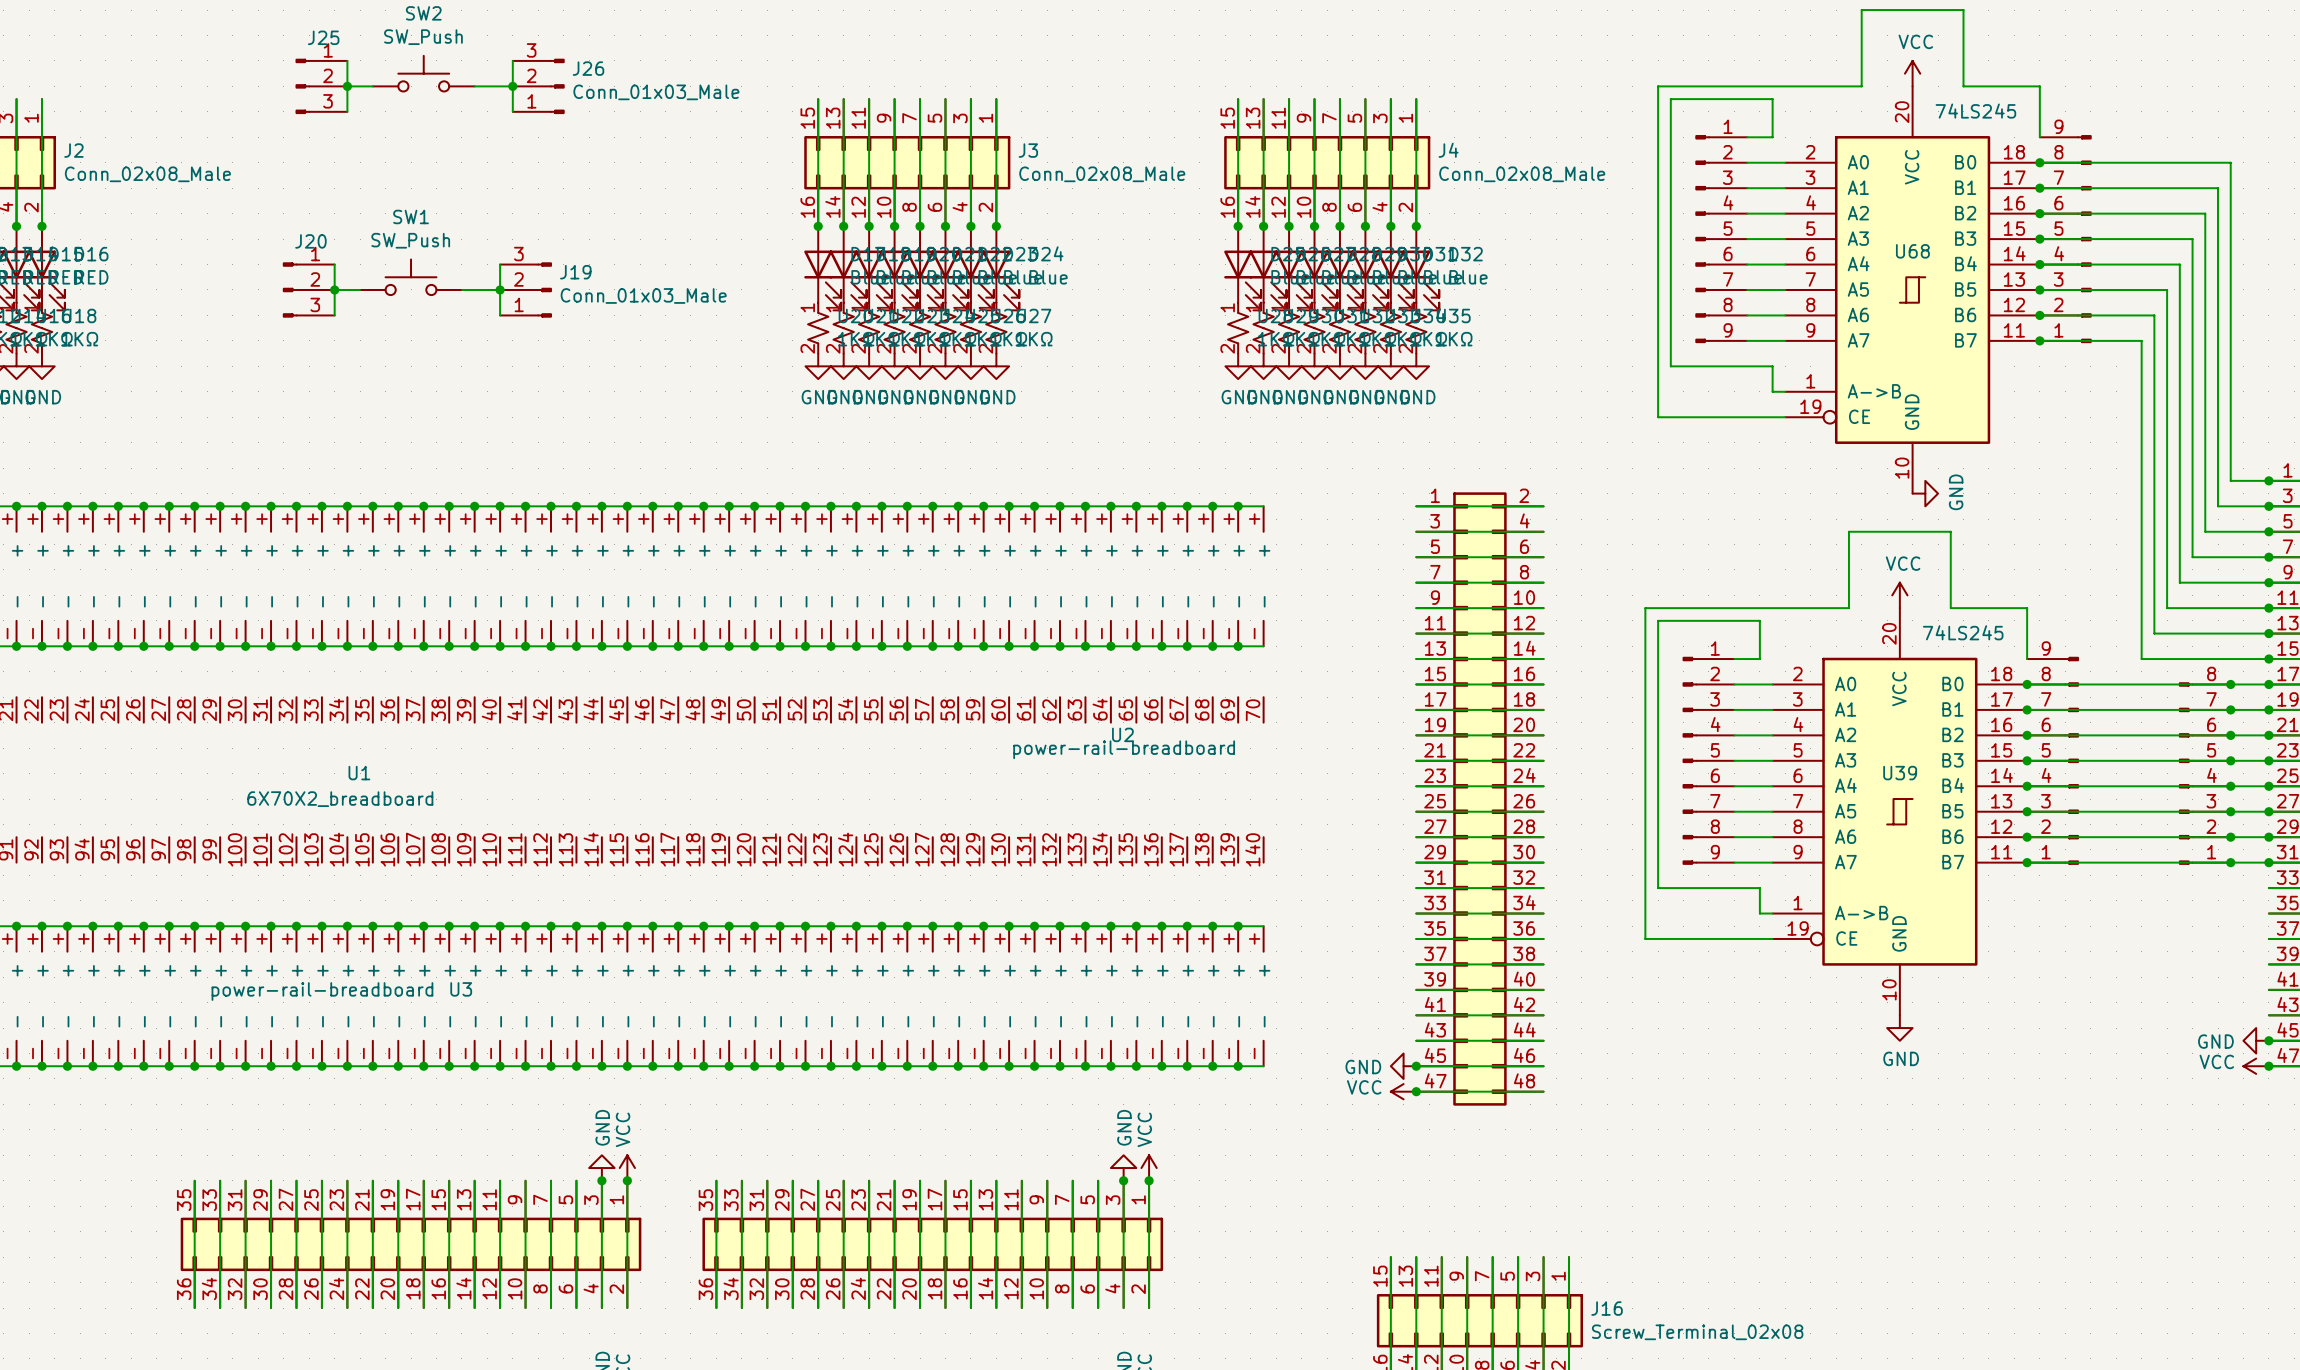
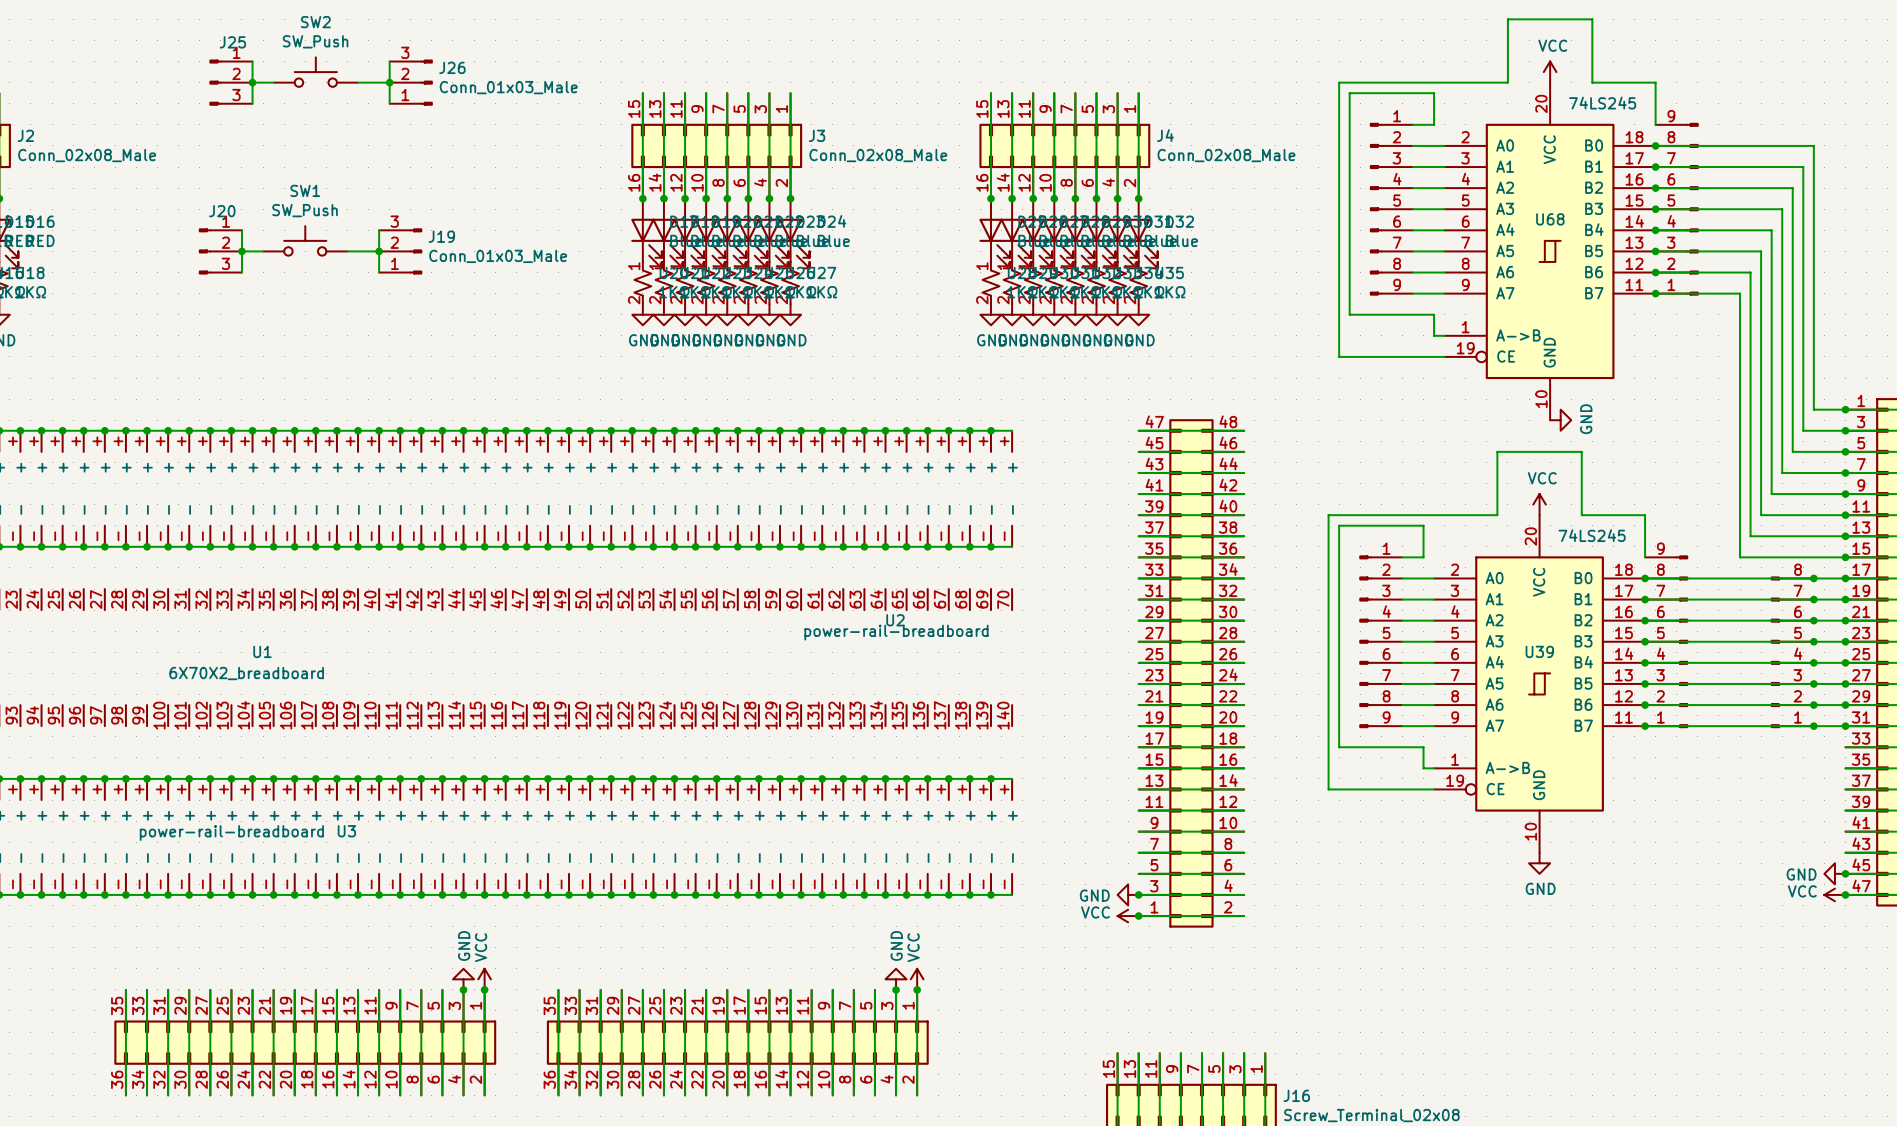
part flip: as is (1479, 799) -> up-down (1191, 673)

